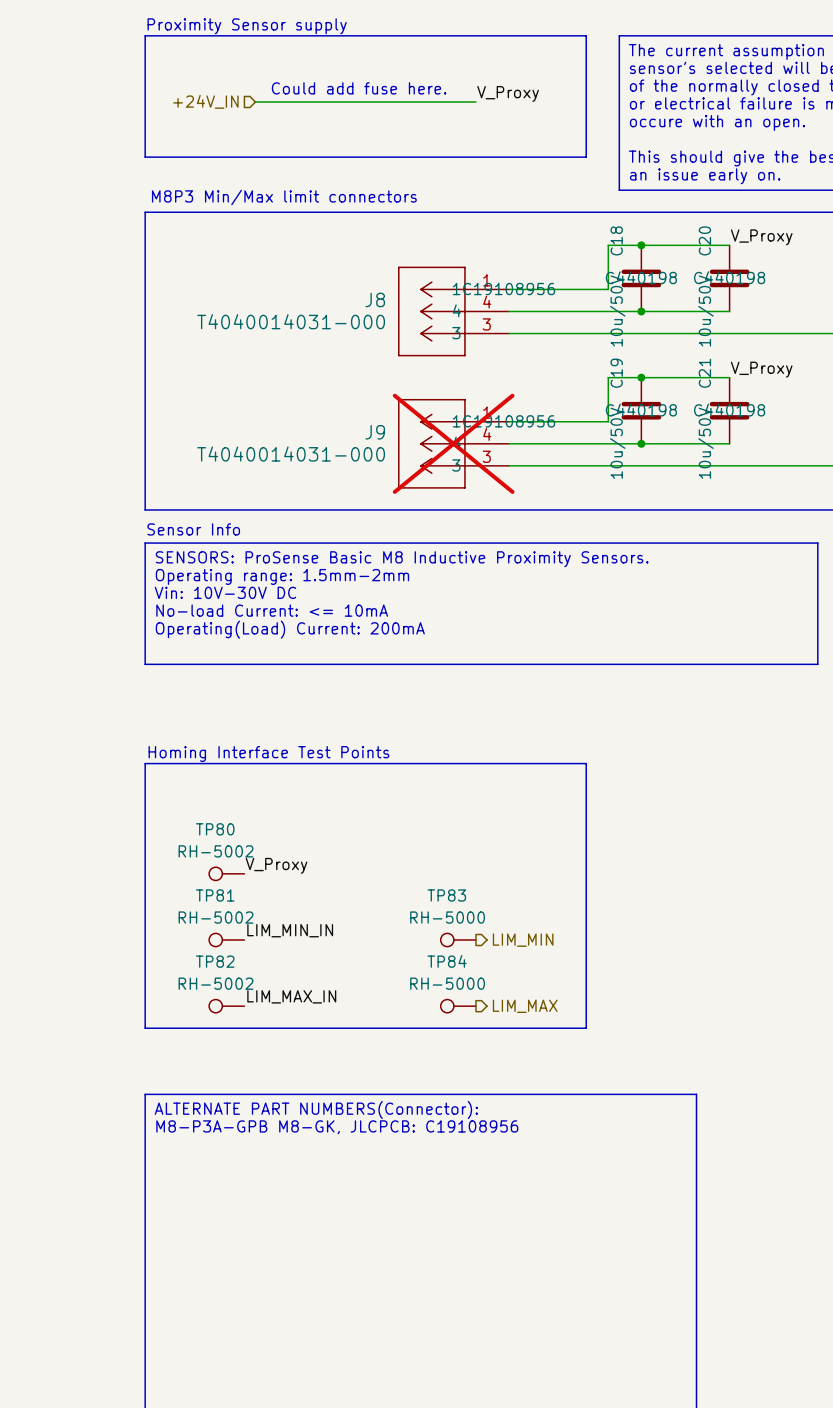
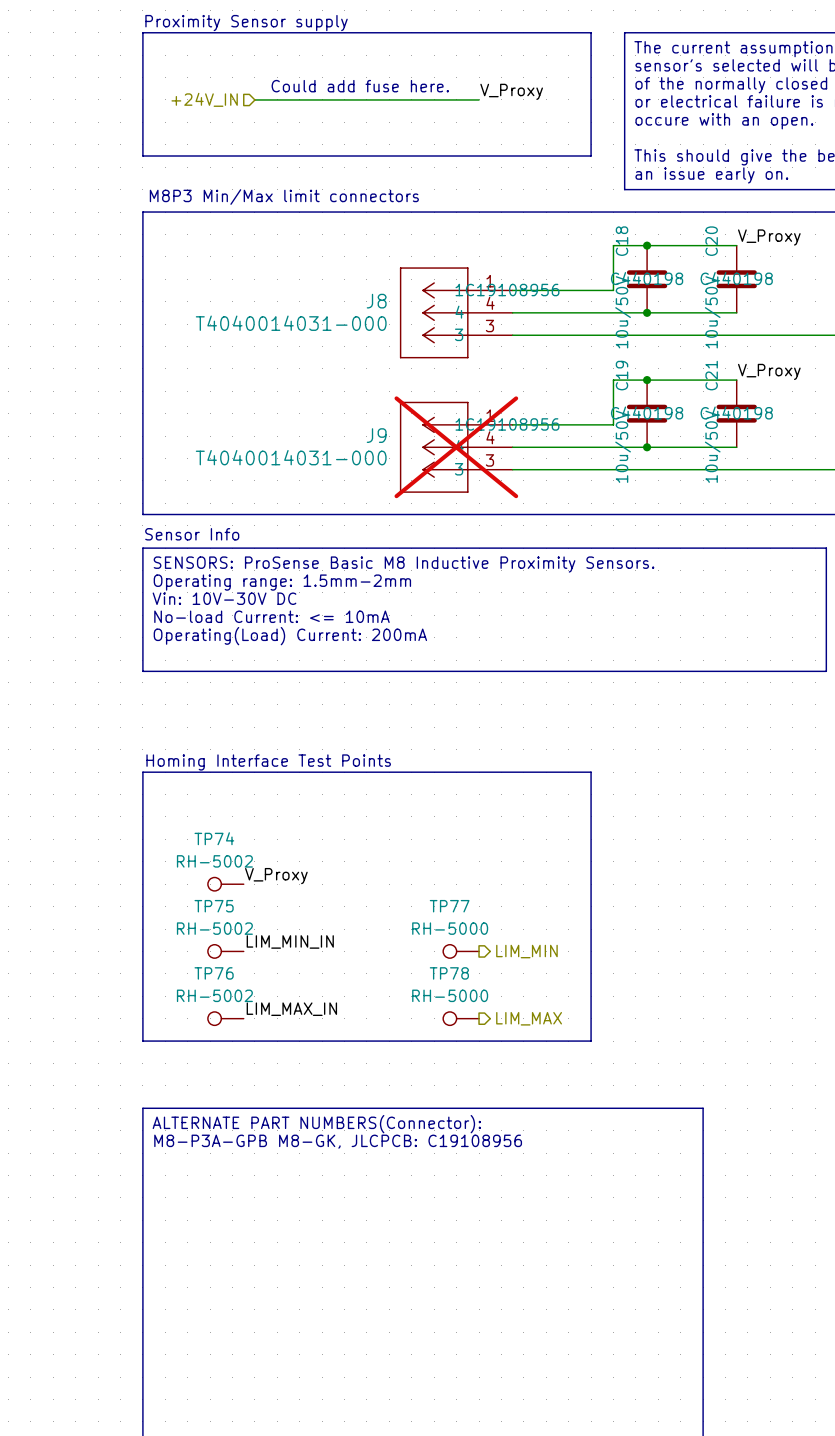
TP80 name: TP80 (215, 829) -> TP74 (214, 838)
TP81 name: TP81 (215, 895) -> TP75 (214, 906)
TP83 name: TP83 (446, 895) -> TP77 (449, 906)
TP82 name: TP82 (215, 961) -> TP76 (214, 973)
TP84 name: TP84 (447, 961) -> TP78 (449, 973)

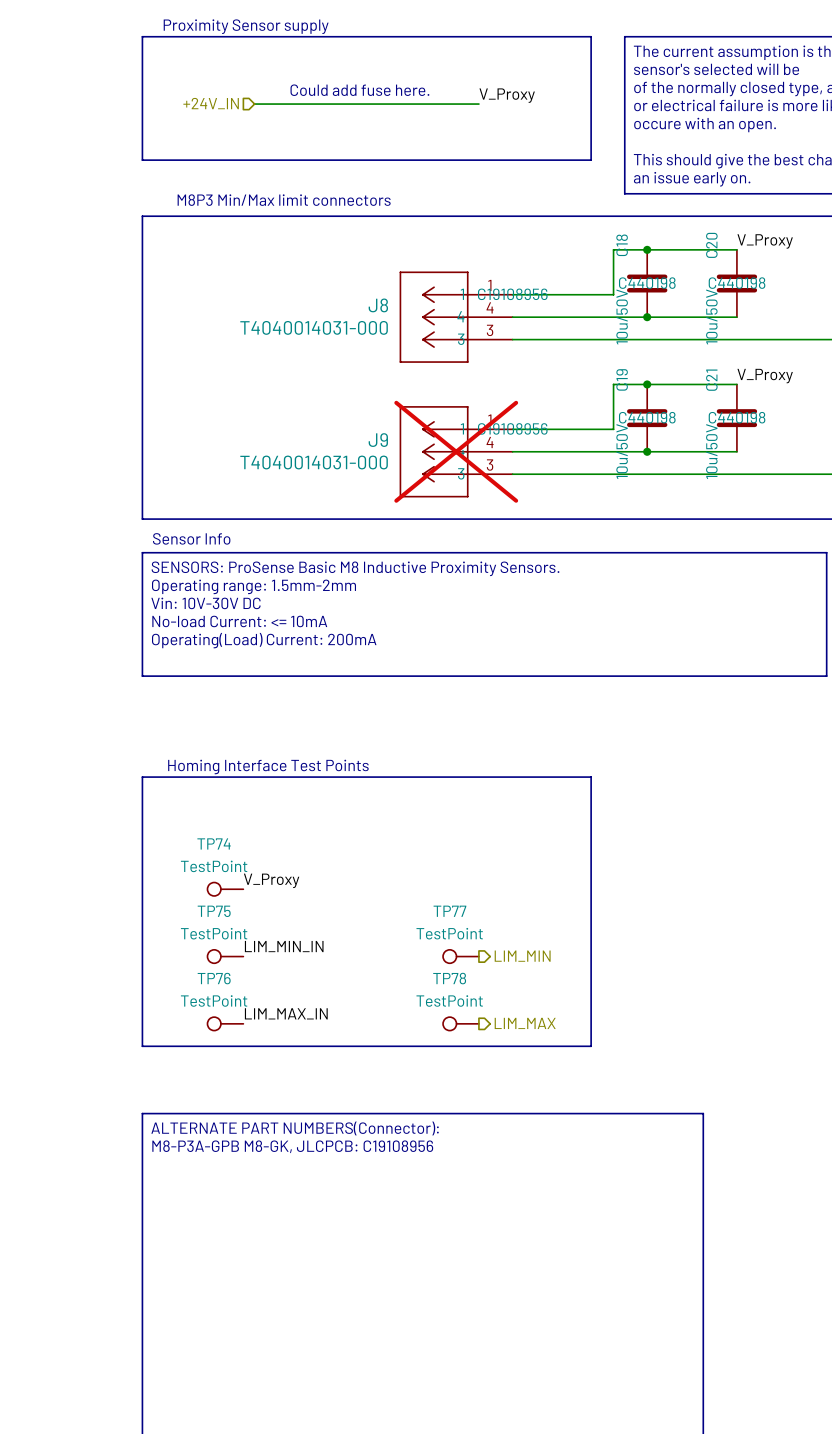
TP74 value: RH-5002 (214, 861) -> TestPoint (214, 866)
TP75 value: RH-5002 (214, 928) -> TestPoint (214, 933)
TP77 value: RH-5000 (450, 928) -> TestPoint (449, 933)
TP76 value: RH-5002 (214, 995) -> TestPoint (214, 1000)
TP78 value: RH-5000 (450, 995) -> TestPoint (449, 1000)

